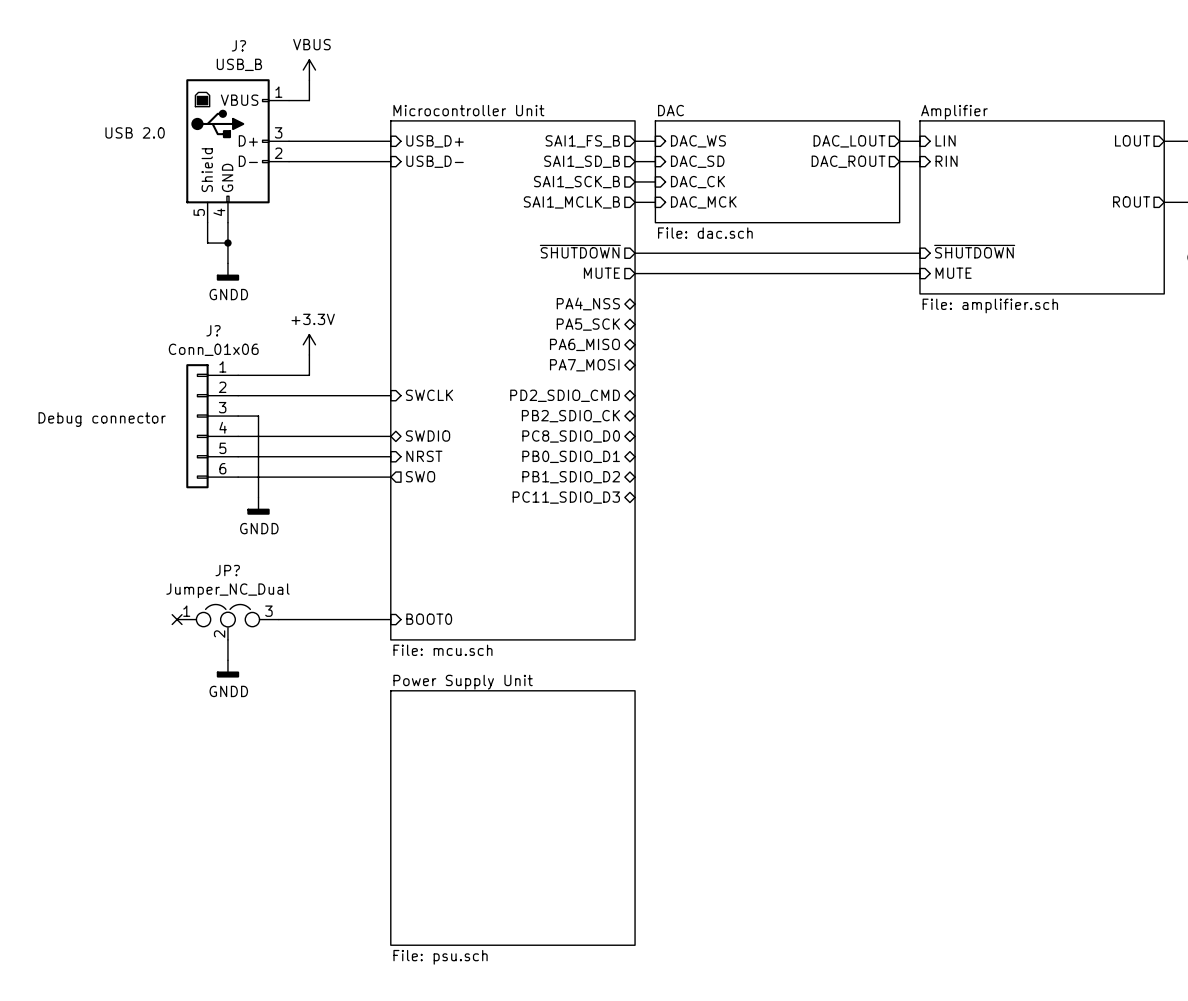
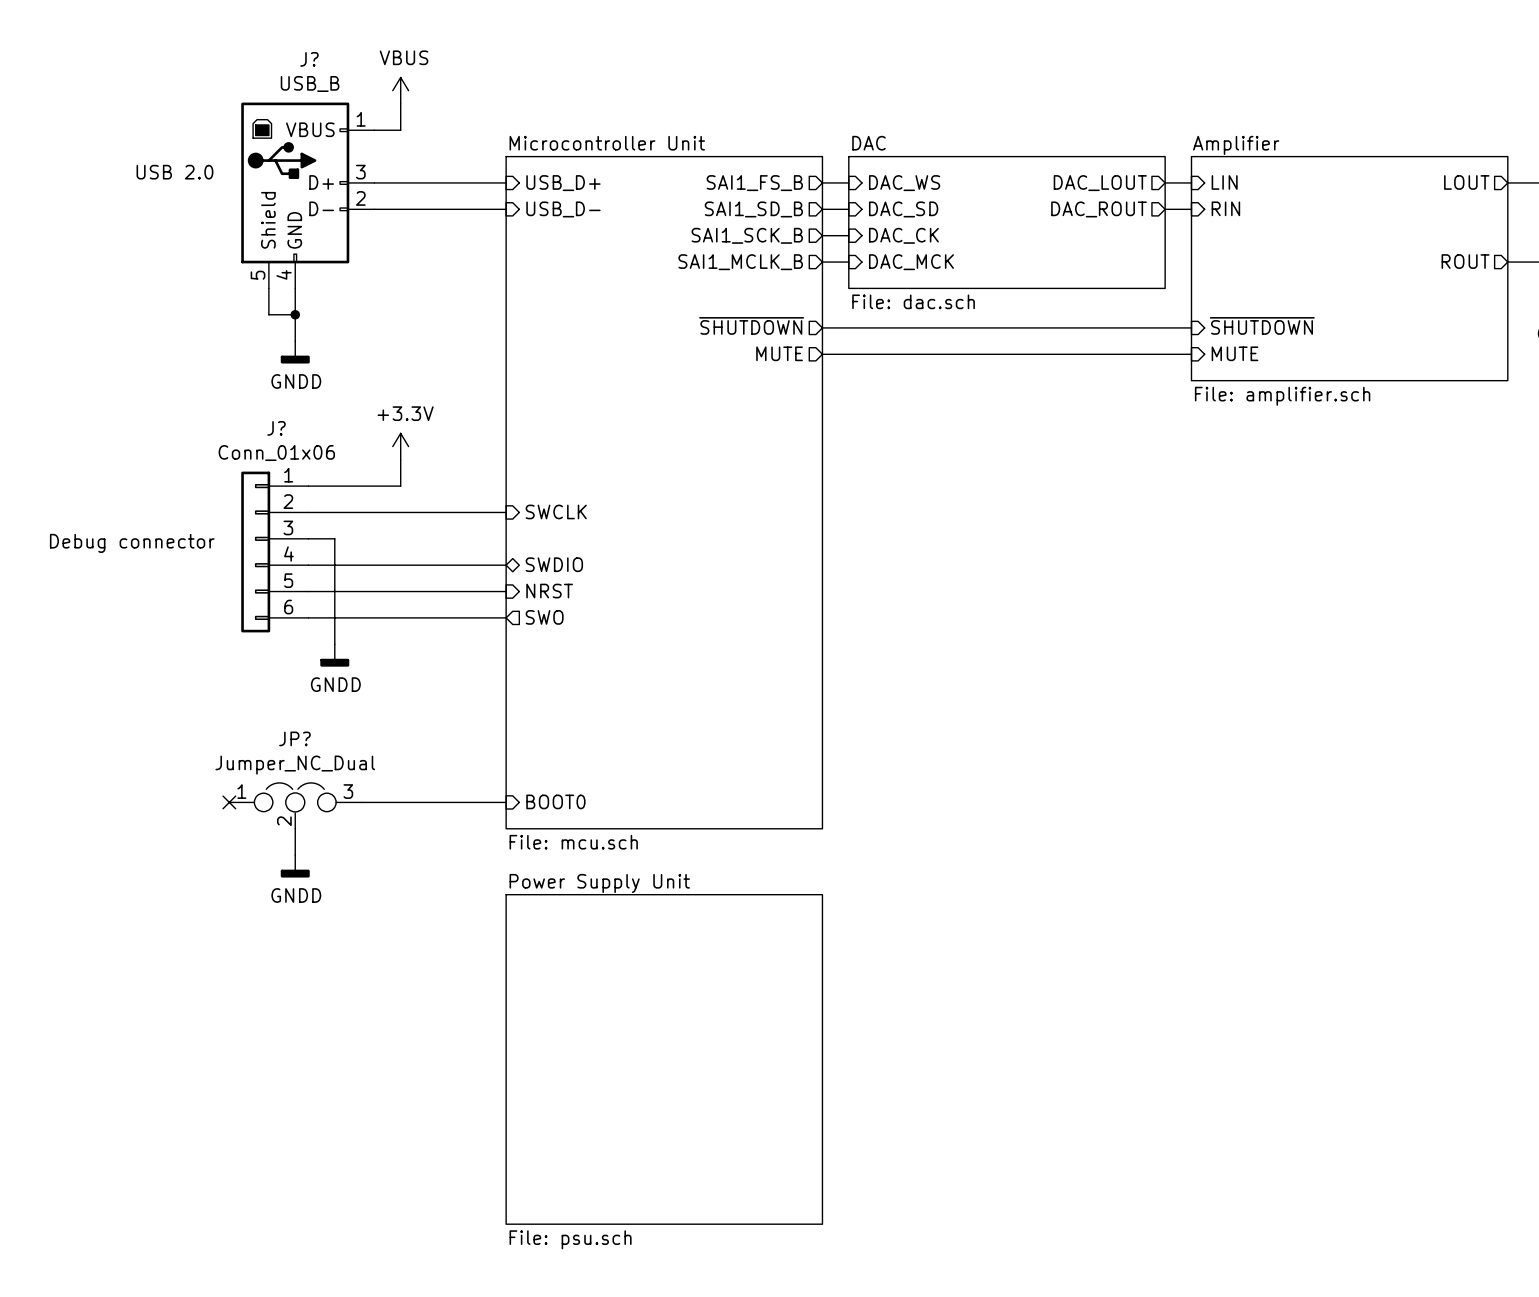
sheet pin: PA4_NSS (588, 303) -> none
sheet pin: PA5_SCK (588, 324) -> none
sheet pin: PA6_MISO (584, 344) -> none
sheet pin: PA7_MOSI (584, 365) -> none
sheet pin: PD2_SDIO_CMD (565, 395) -> none
sheet pin: PB2_SDIO_CK (570, 416) -> none
sheet pin: PC8_SDIO_D0 (571, 436) -> none
sheet pin: PB0_SDIO_D1 (571, 456) -> none
sheet pin: PB1_SDIO_D2 (571, 477) -> none
sheet pin: PC11_SDIO_D3 (566, 497) -> none

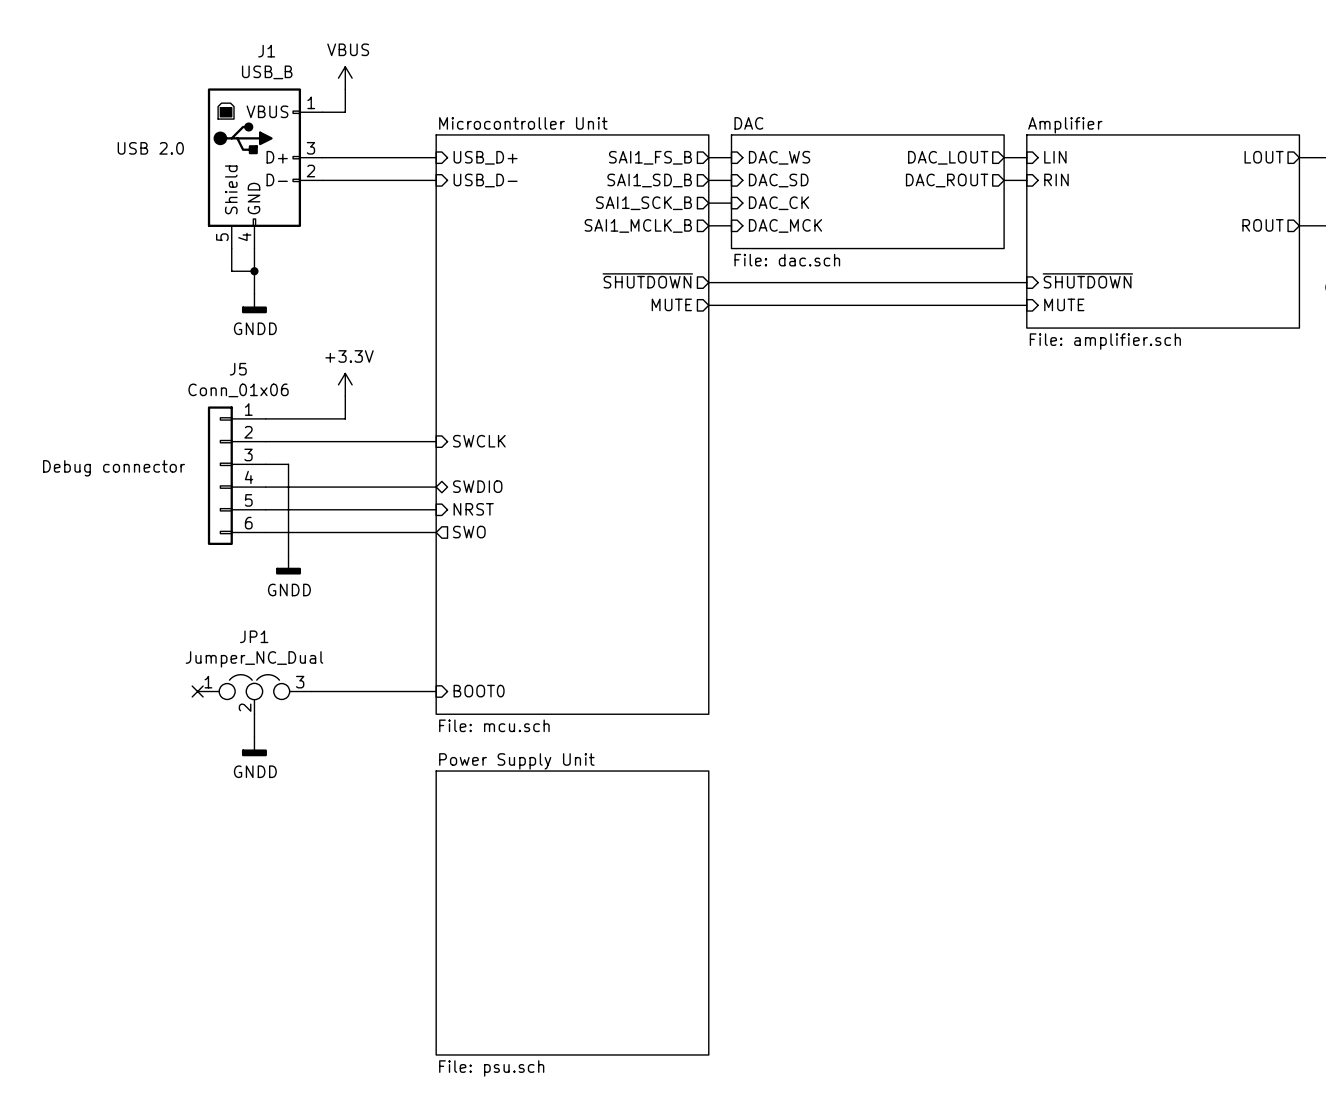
J? name: J? (309, 59) -> J1 (266, 51)
J? name: J? (276, 428) -> J5 (238, 369)
JP? name: JP? (294, 738) -> JP1 (254, 636)

